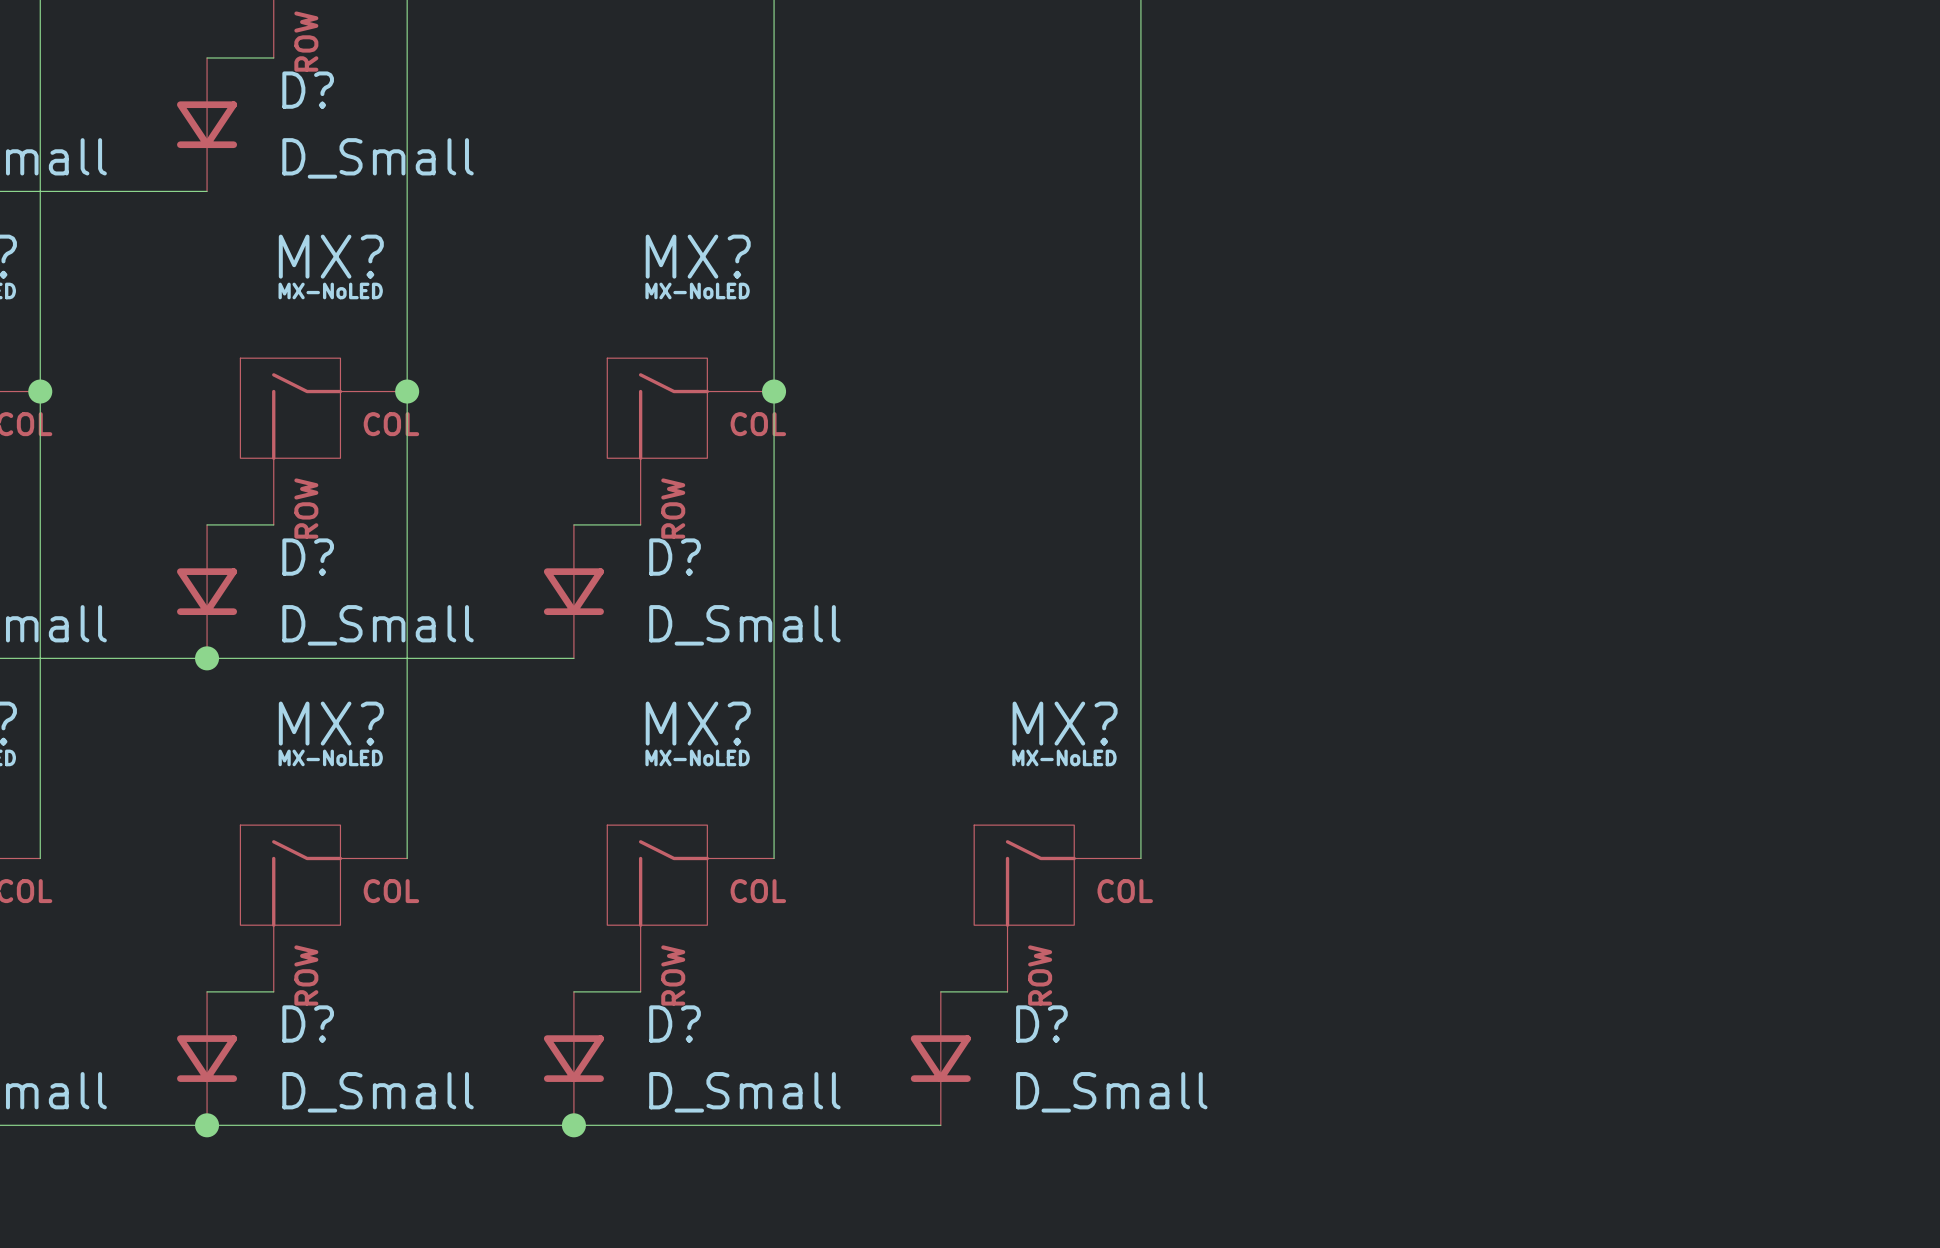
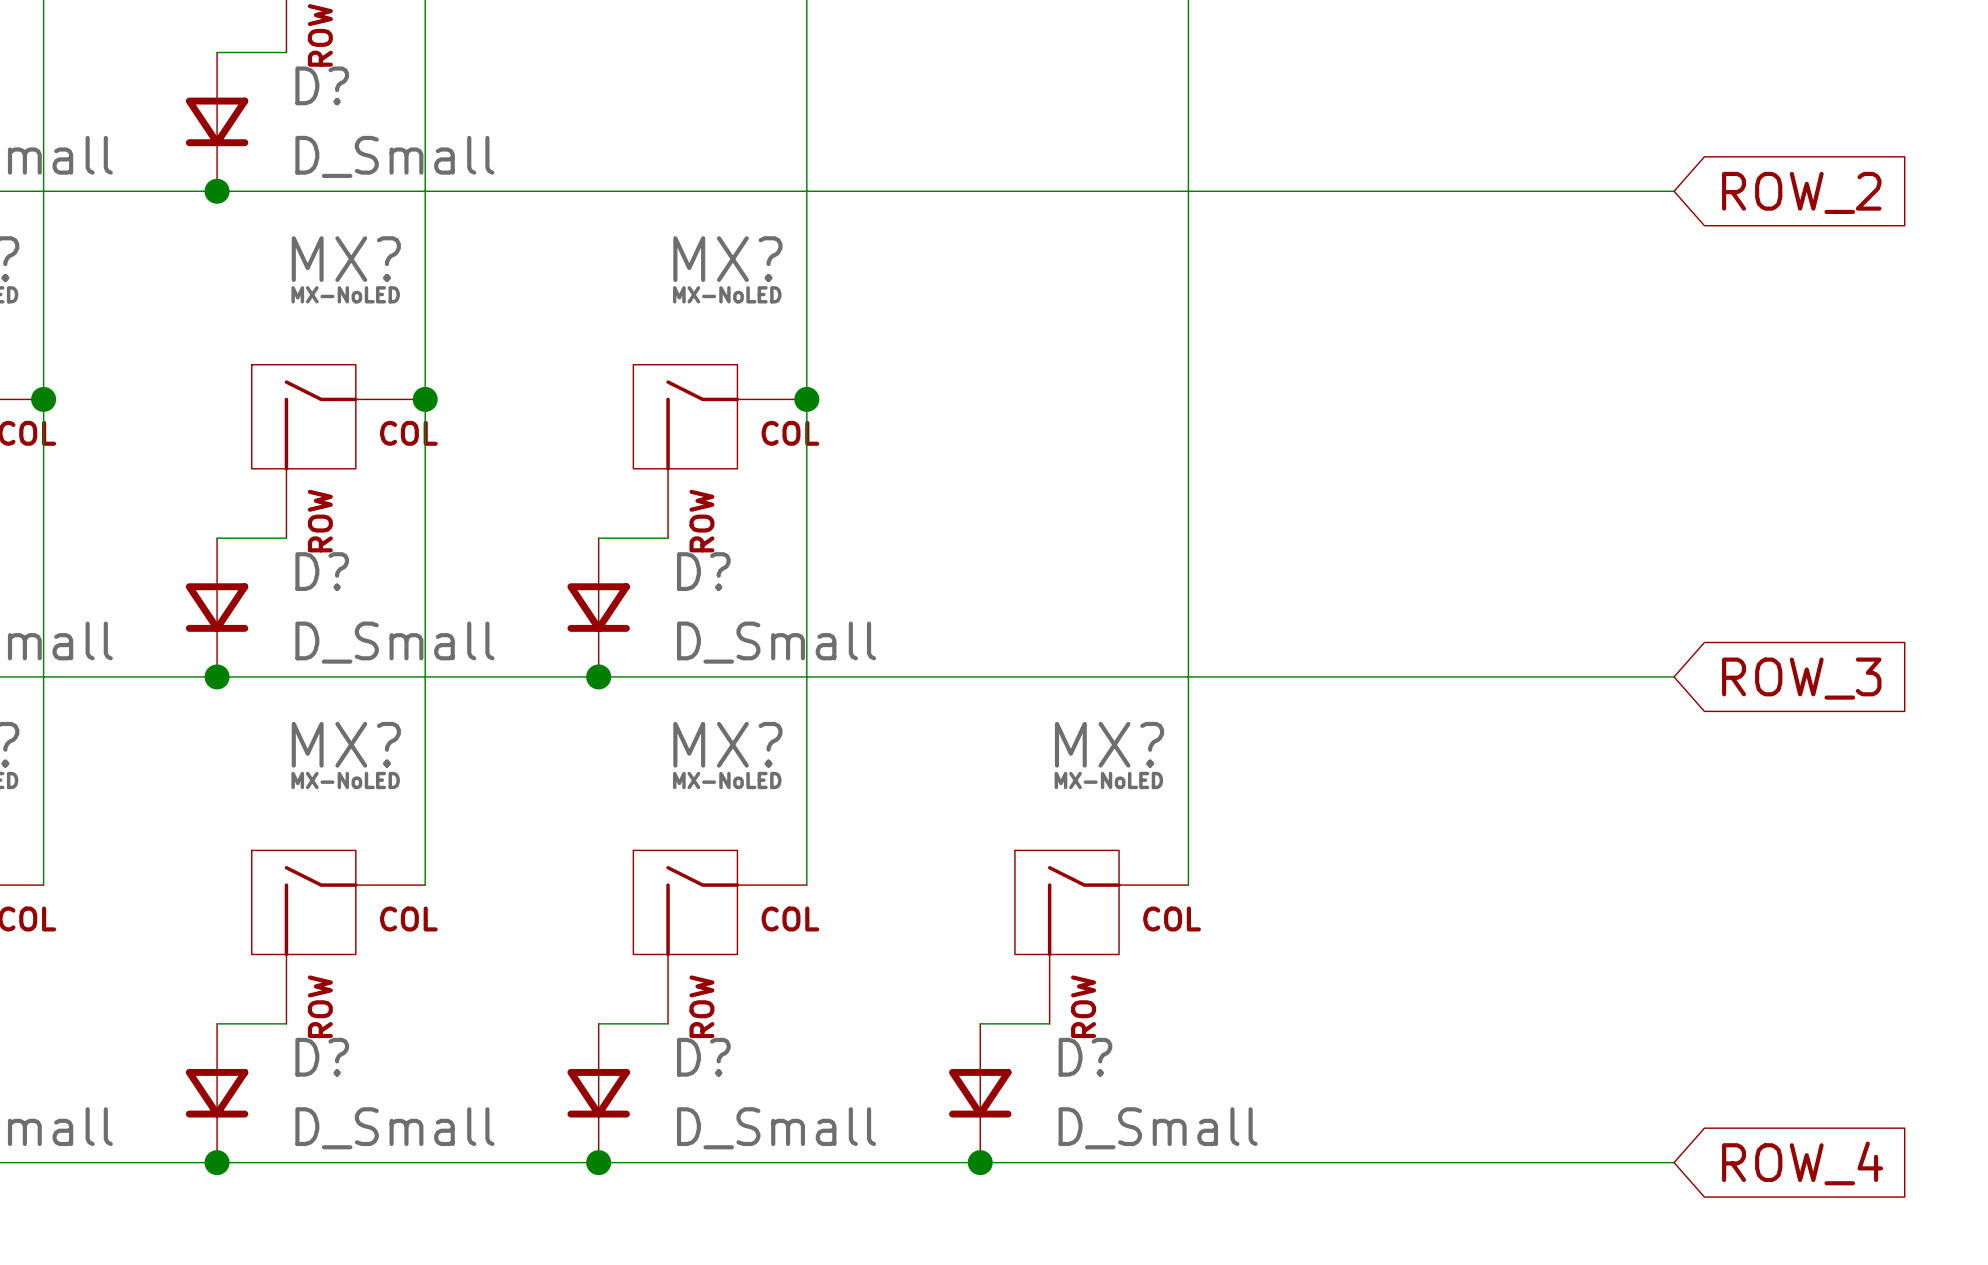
wire: none -> (217, 191) (1674, 191)
junction: none -> (217, 191)
global label: none -> ROW_2 (1801, 192)
wire: none -> (598, 676) (1674, 676)
junction: none -> (598, 676)
global label: none -> ROW_3 (1801, 678)
wire: none -> (980, 1162) (1674, 1162)
junction: none -> (980, 1162)
global label: none -> ROW_4 (1802, 1163)

